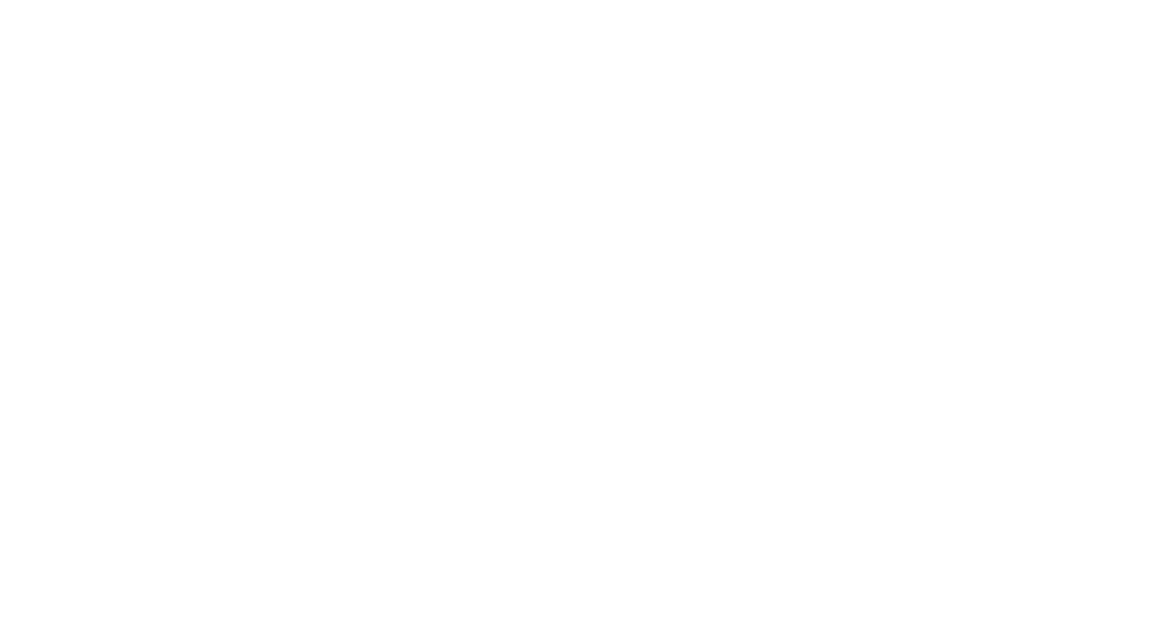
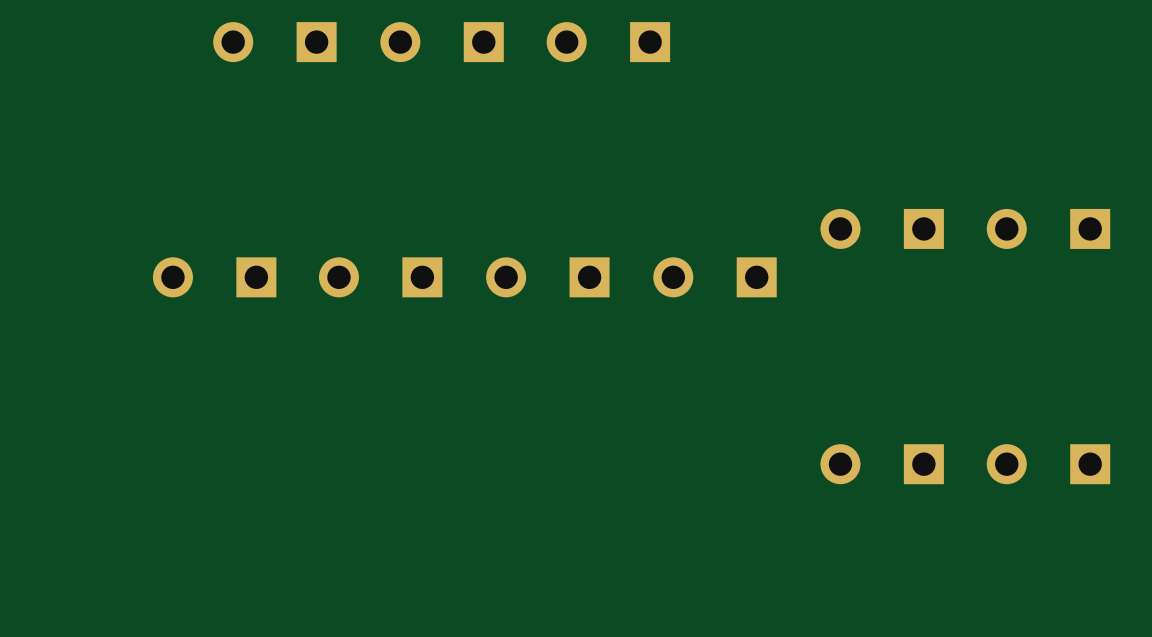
part: none -> (274, 42)
part: none -> (442, 42)
part: none -> (608, 42)
part: none -> (882, 228)
part: none -> (1048, 228)
part: none -> (214, 277)
part: none -> (380, 277)
part: none -> (547, 277)
part: none -> (715, 277)
part: none -> (882, 464)
part: none -> (1048, 464)

